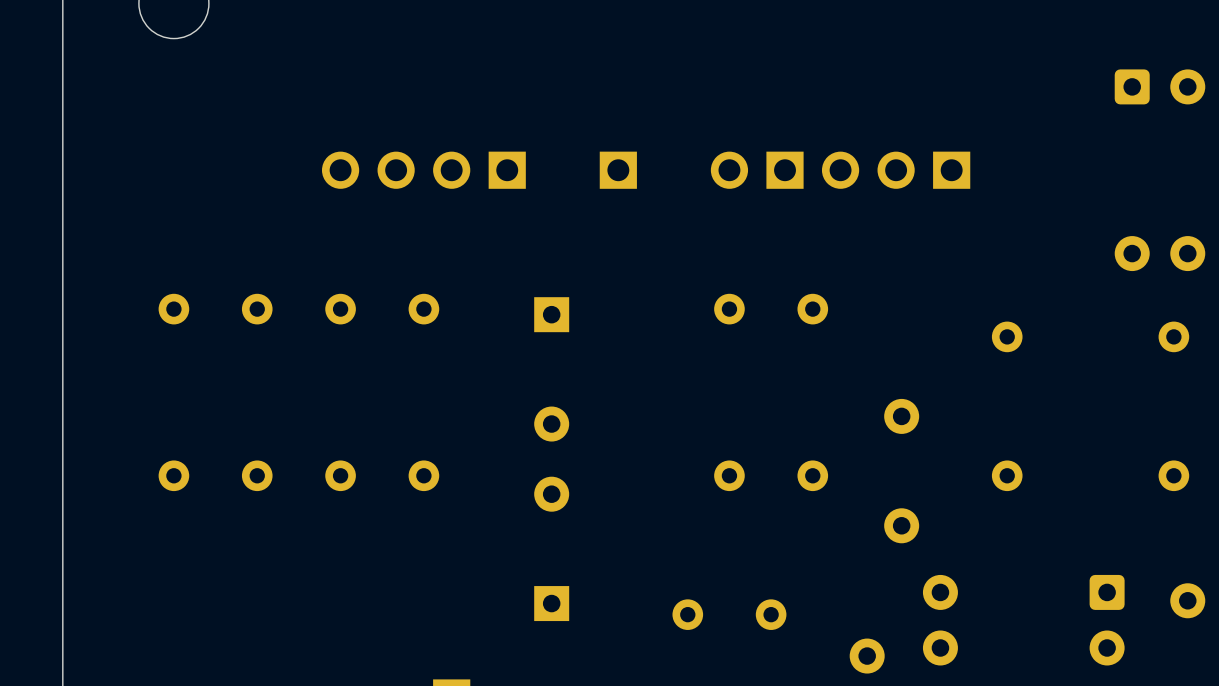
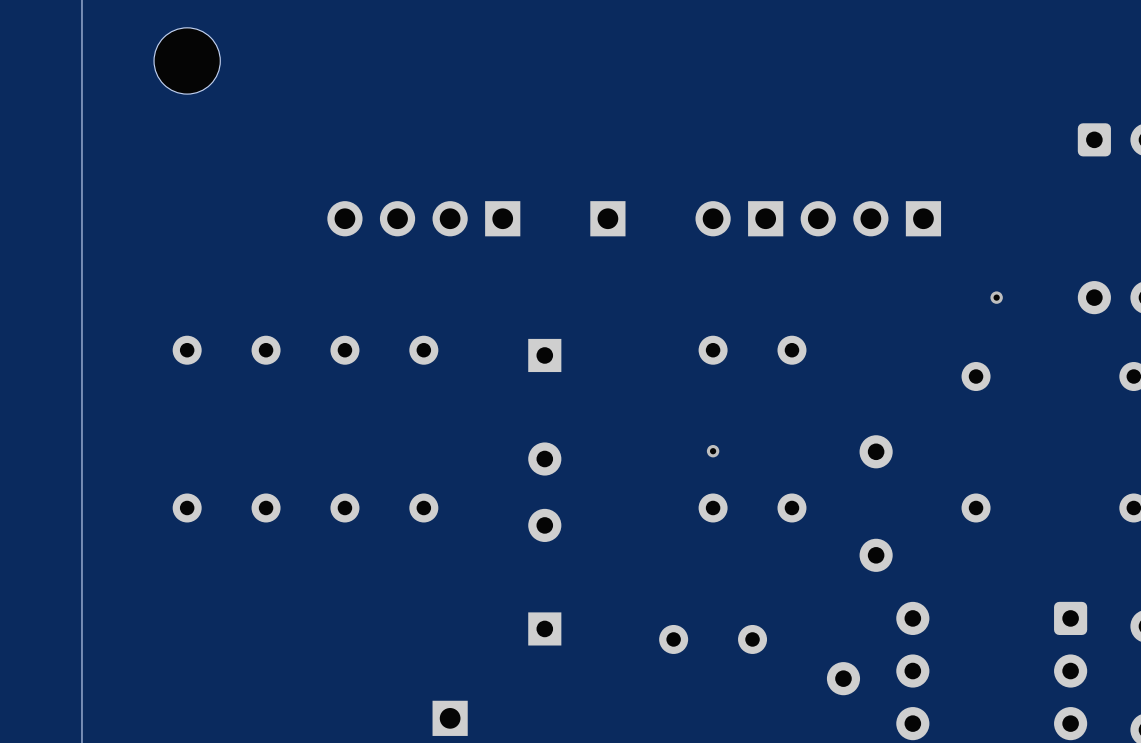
via: none -> (996, 297)
via: none -> (713, 451)

